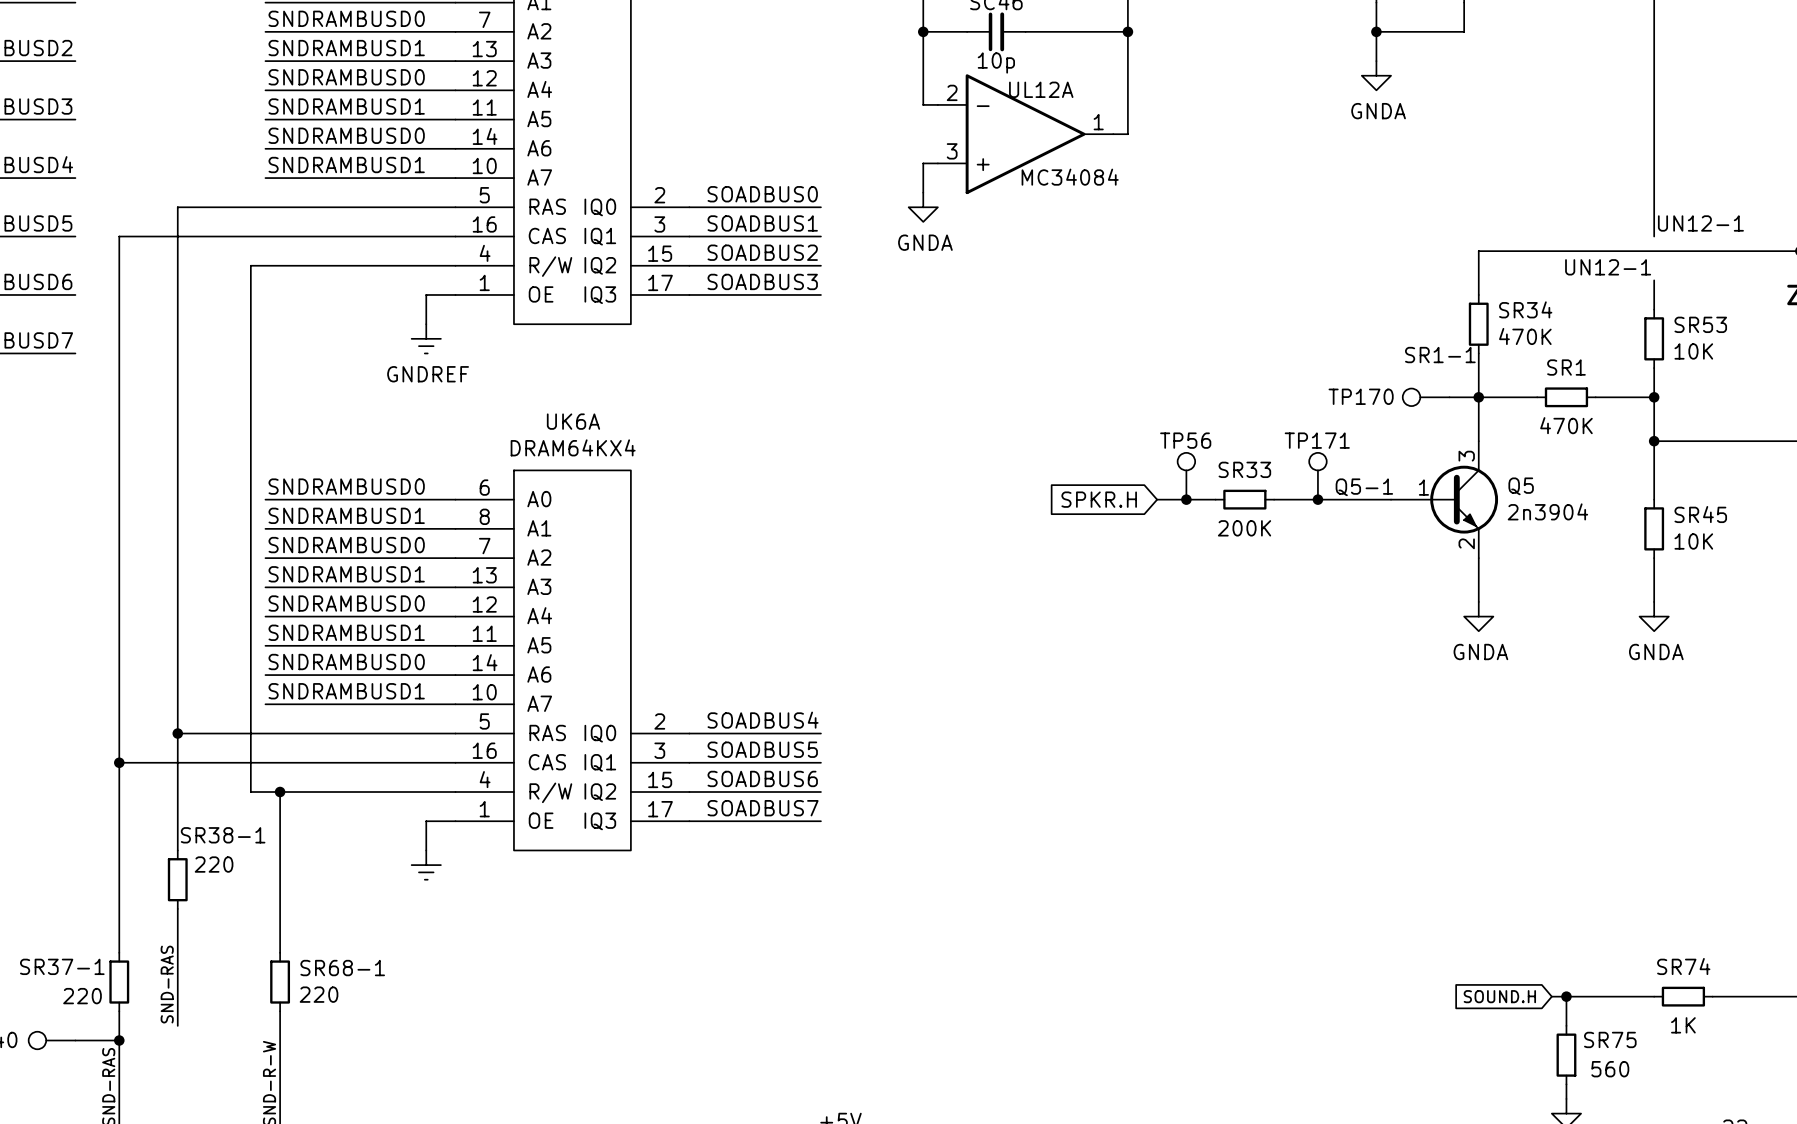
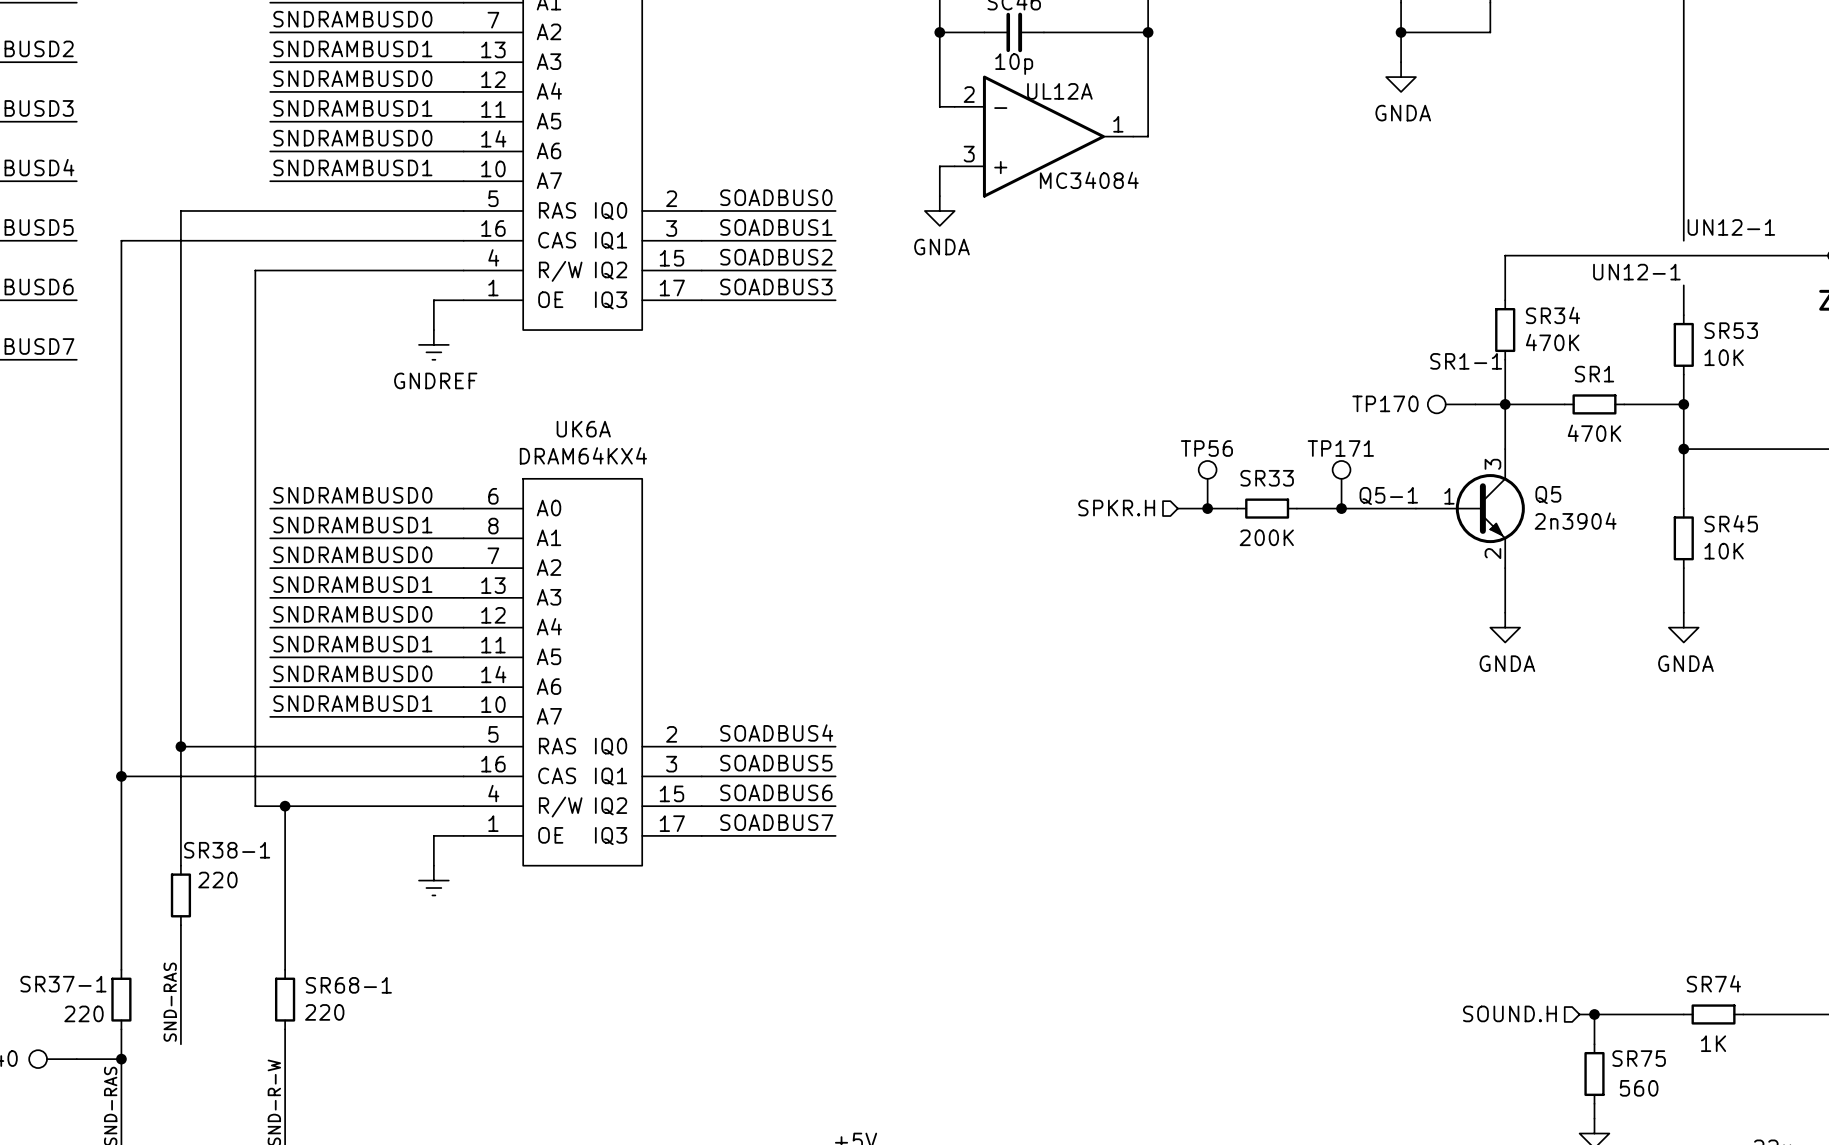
hierarchical label: none -> SPKR.H (1116, 508)
global label: SPKR.H (1099, 499) -> none
hierarchical label: none -> SOUND.H (1509, 1013)
global label: SOUND.H (1499, 996) -> none

